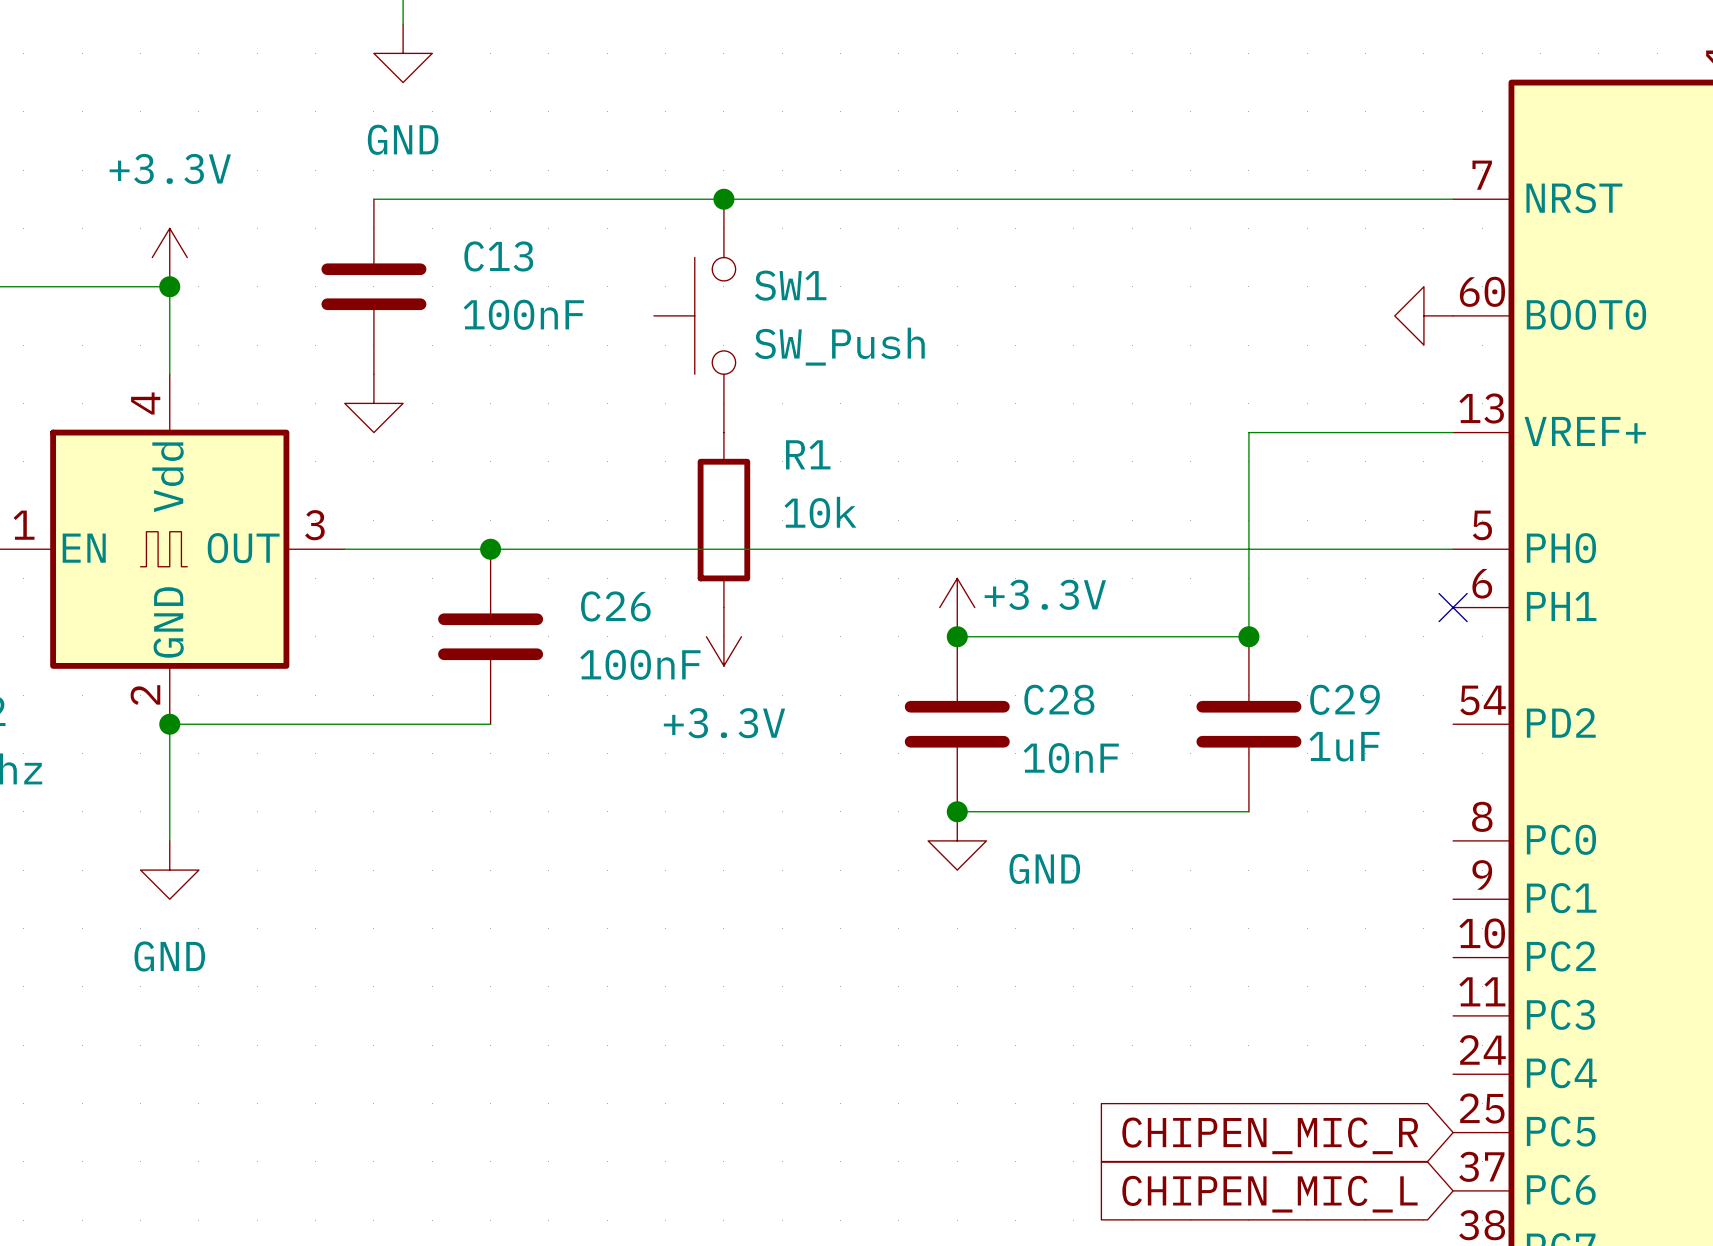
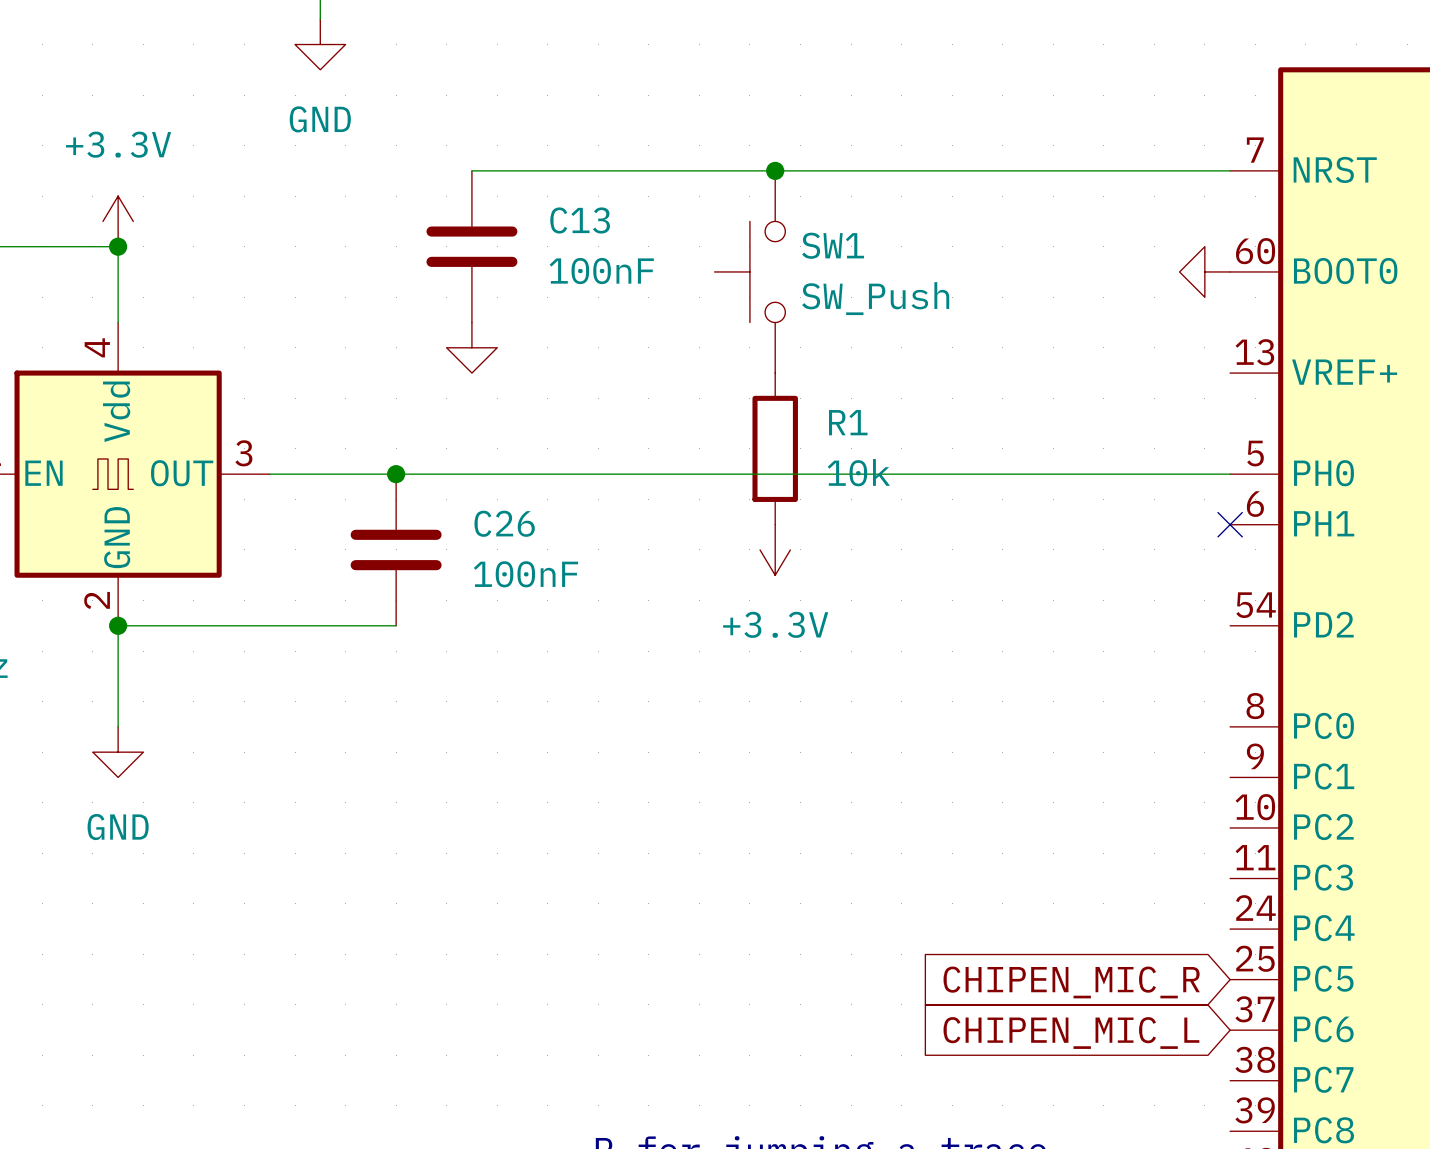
wire: (373, 199) (578, 199) -> none
junction: (723, 199) -> none
junction: none -> (775, 170)
C13 position: (373, 286) -> (471, 246)
SW1 position: (694, 315) -> (749, 271)
power symbol position: (373, 403) -> (471, 347)
wire: (1453, 432) (1248, 432) (1248, 636) (957, 636) -> none
R1 name position: R1 (808, 454) -> R1 (848, 422)
R1 value position: 10k (820, 512) -> 10k (858, 472)
R1 position: (723, 520) -> (775, 448)
power symbol text position: +3.3V (1045, 594) -> +3.3V (775, 624)
power symbol rotation: 0° (957, 607) -> 180° (775, 549)
power symbol position: +3.3V (957, 607) -> +3.3V (775, 549)
power symbol: +3.3V (723, 636) -> none
junction: (957, 636) -> none
junction: (1248, 636) -> none
C28: 10nF (957, 724) -> none
C29: 1uF (1248, 724) -> none
wire: (957, 811) (1248, 811) -> none
junction: (957, 811) -> none
power symbol: GND (957, 840) -> none

